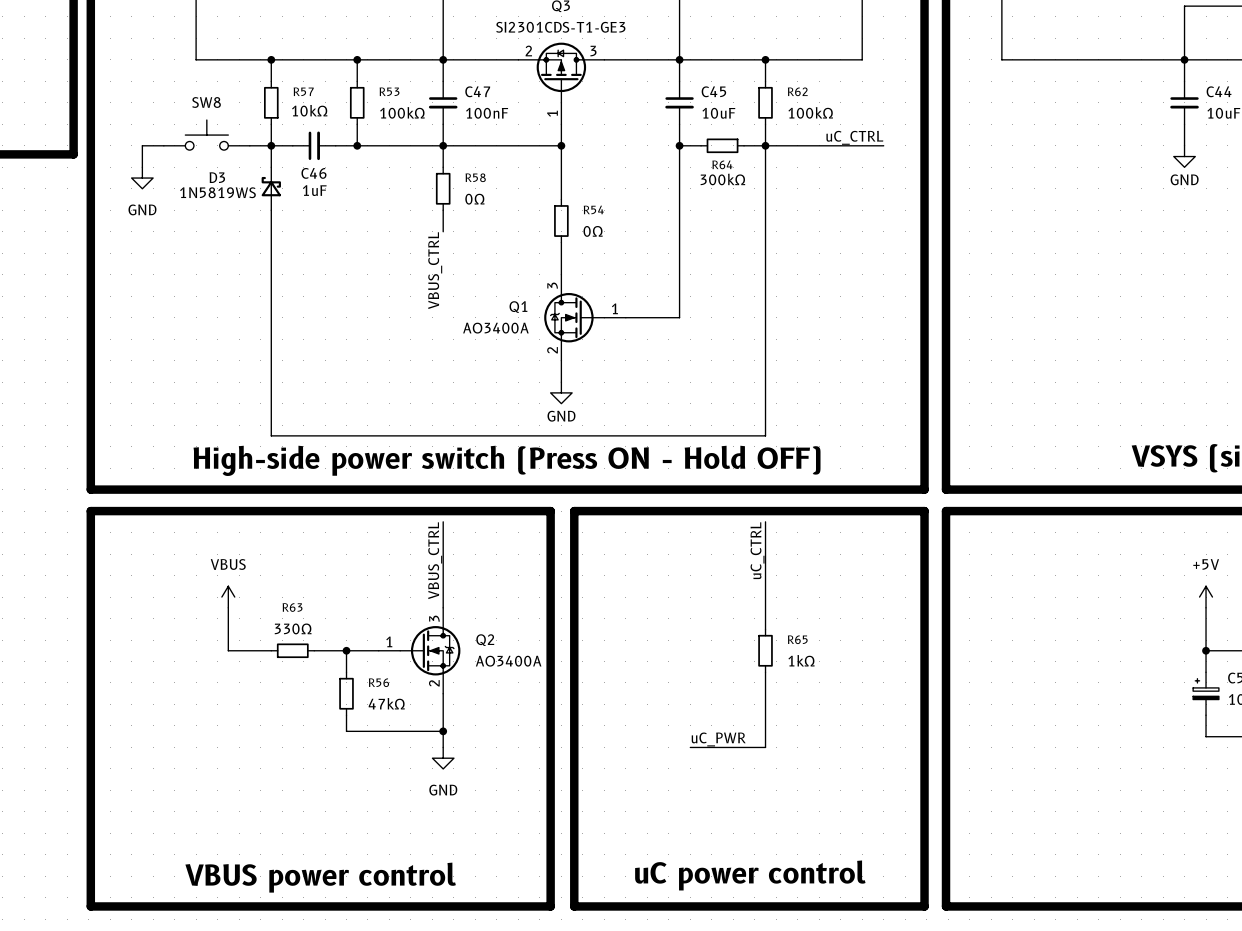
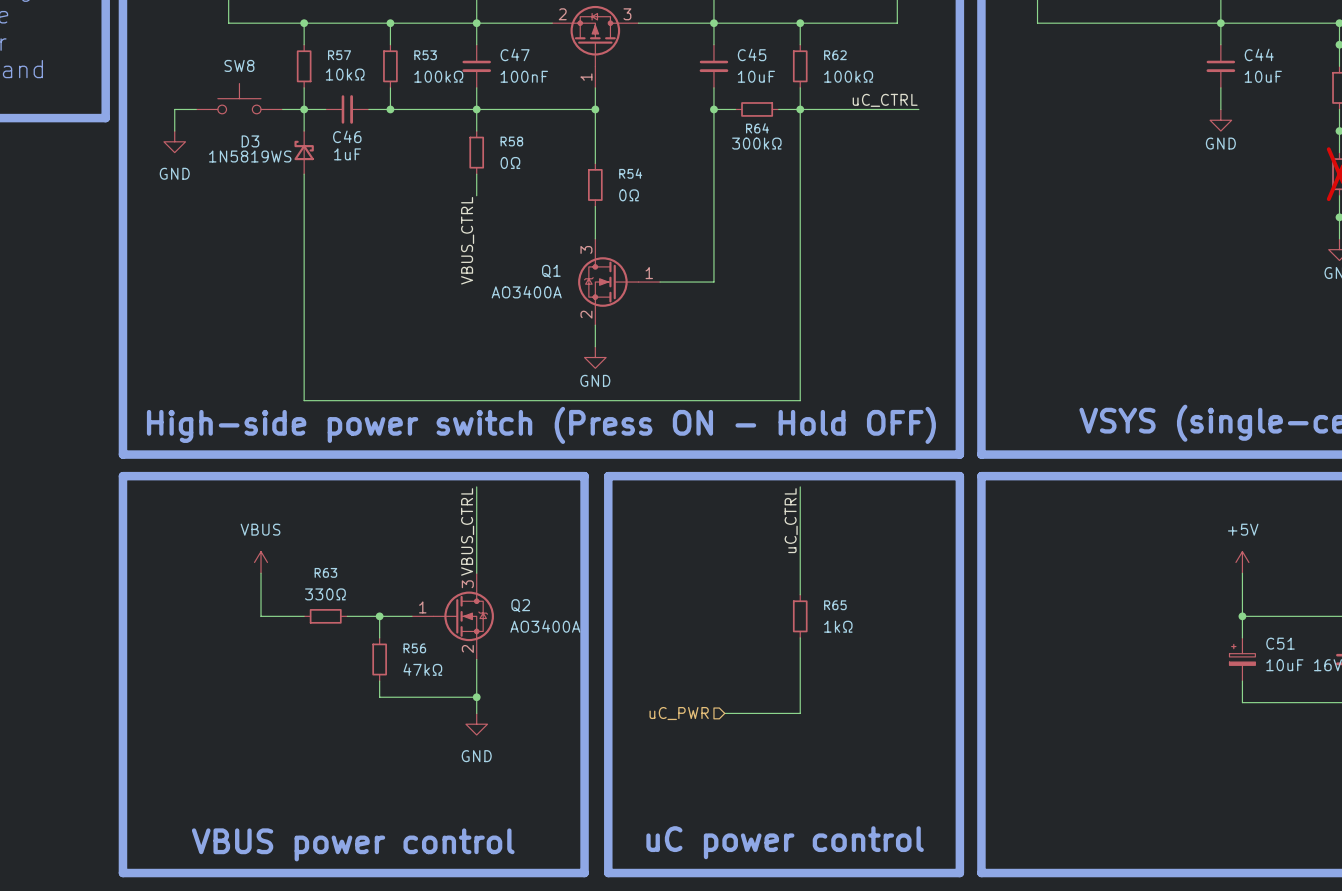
label: uC_PWR (718, 739) -> none
hierarchical label: none -> uC_PWR (679, 713)

